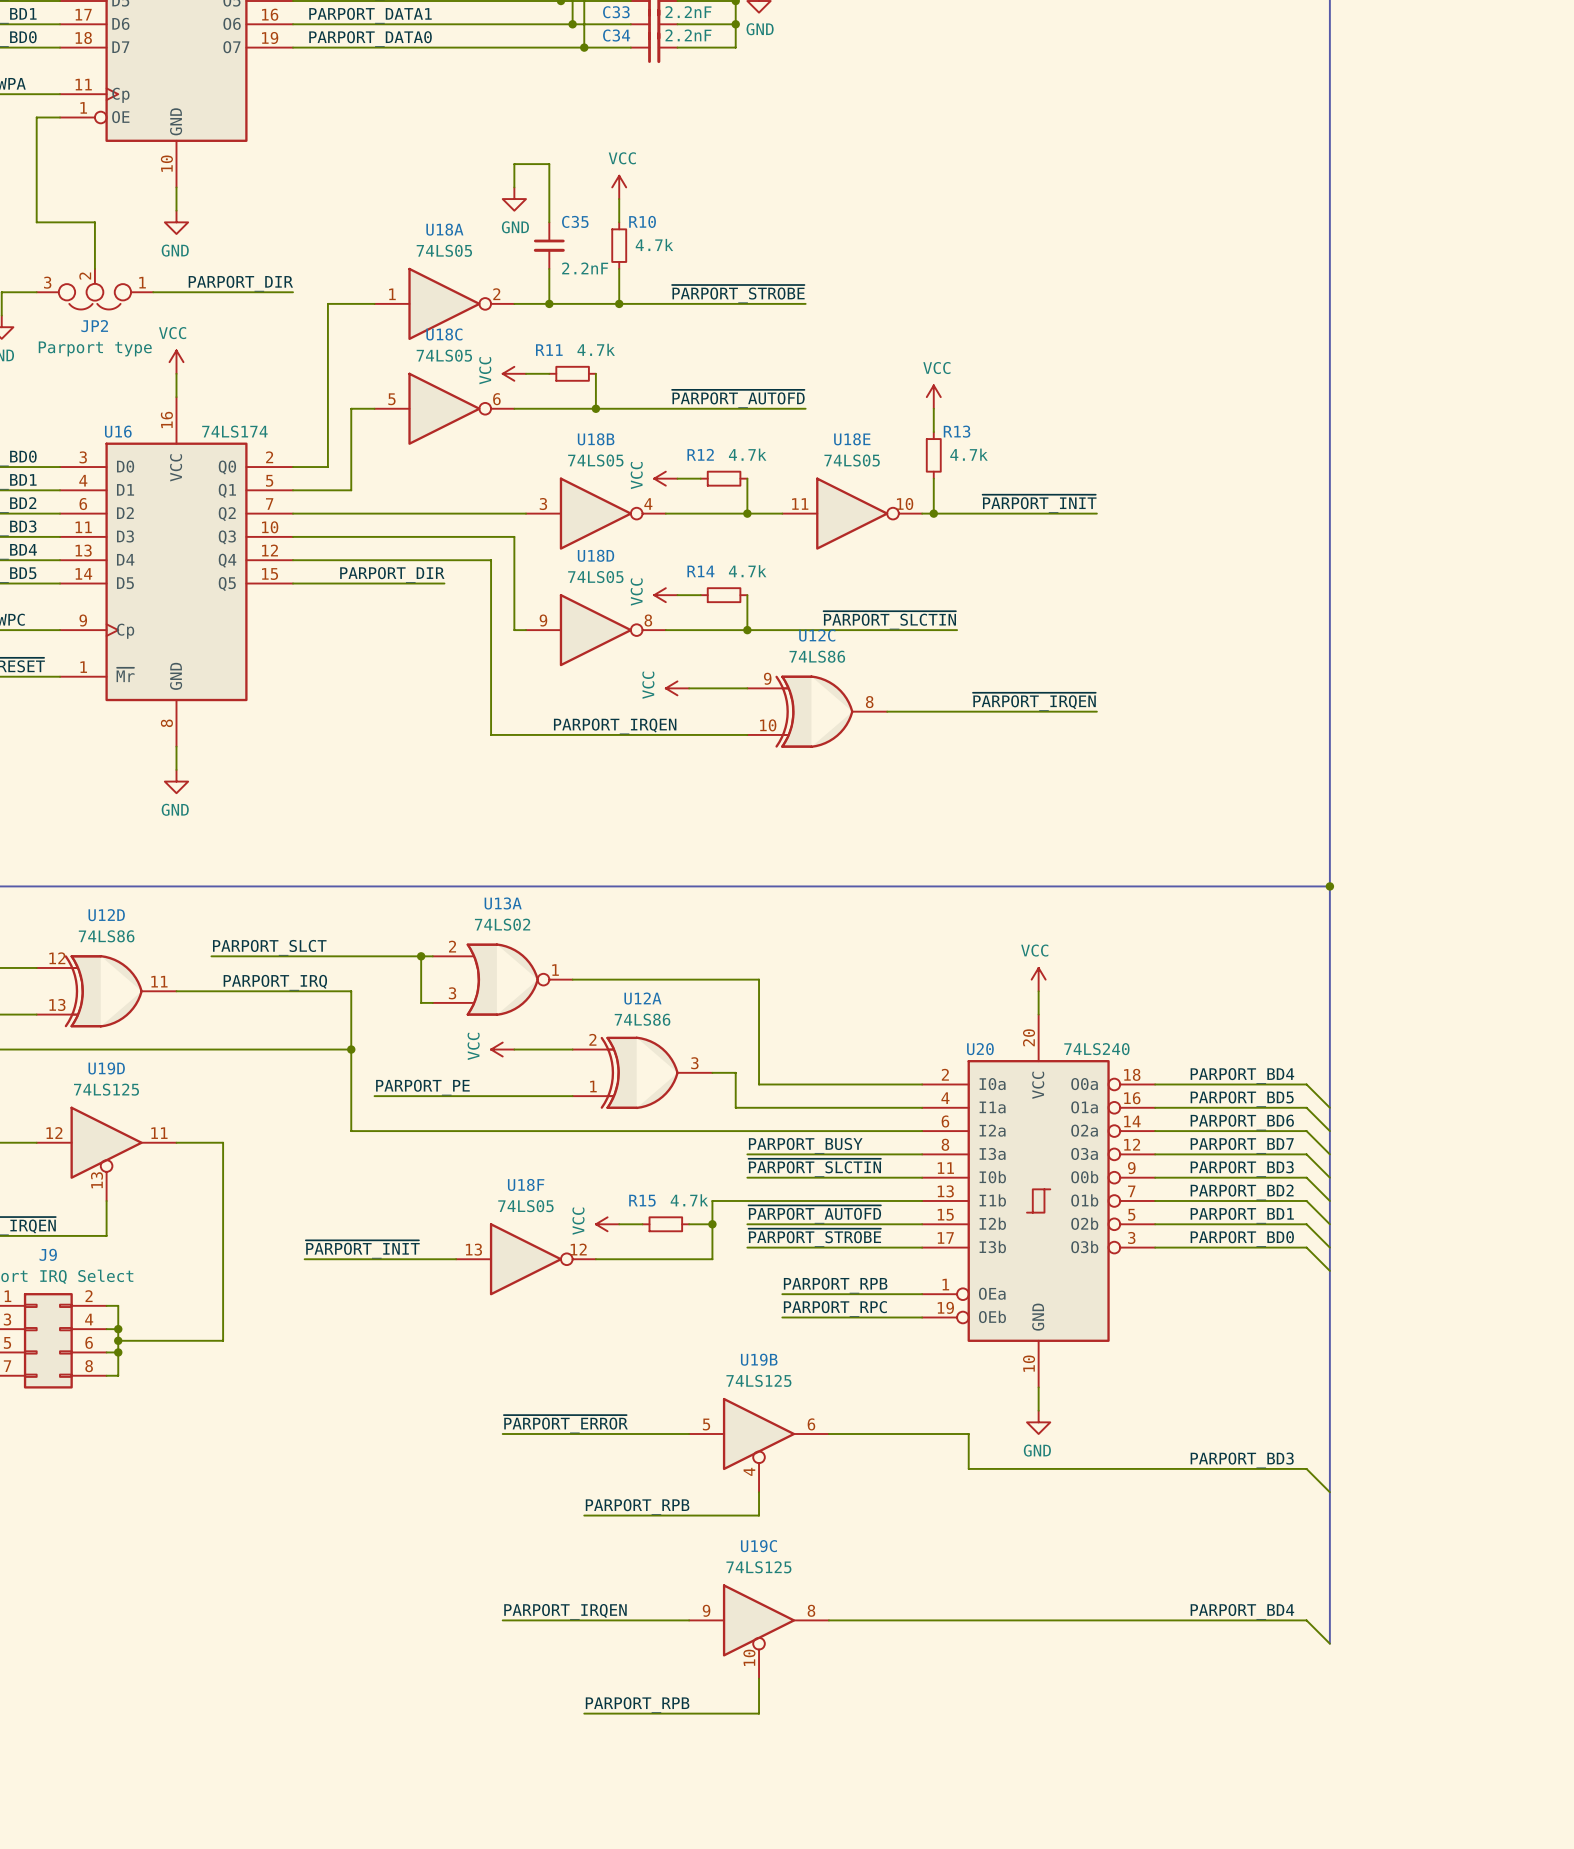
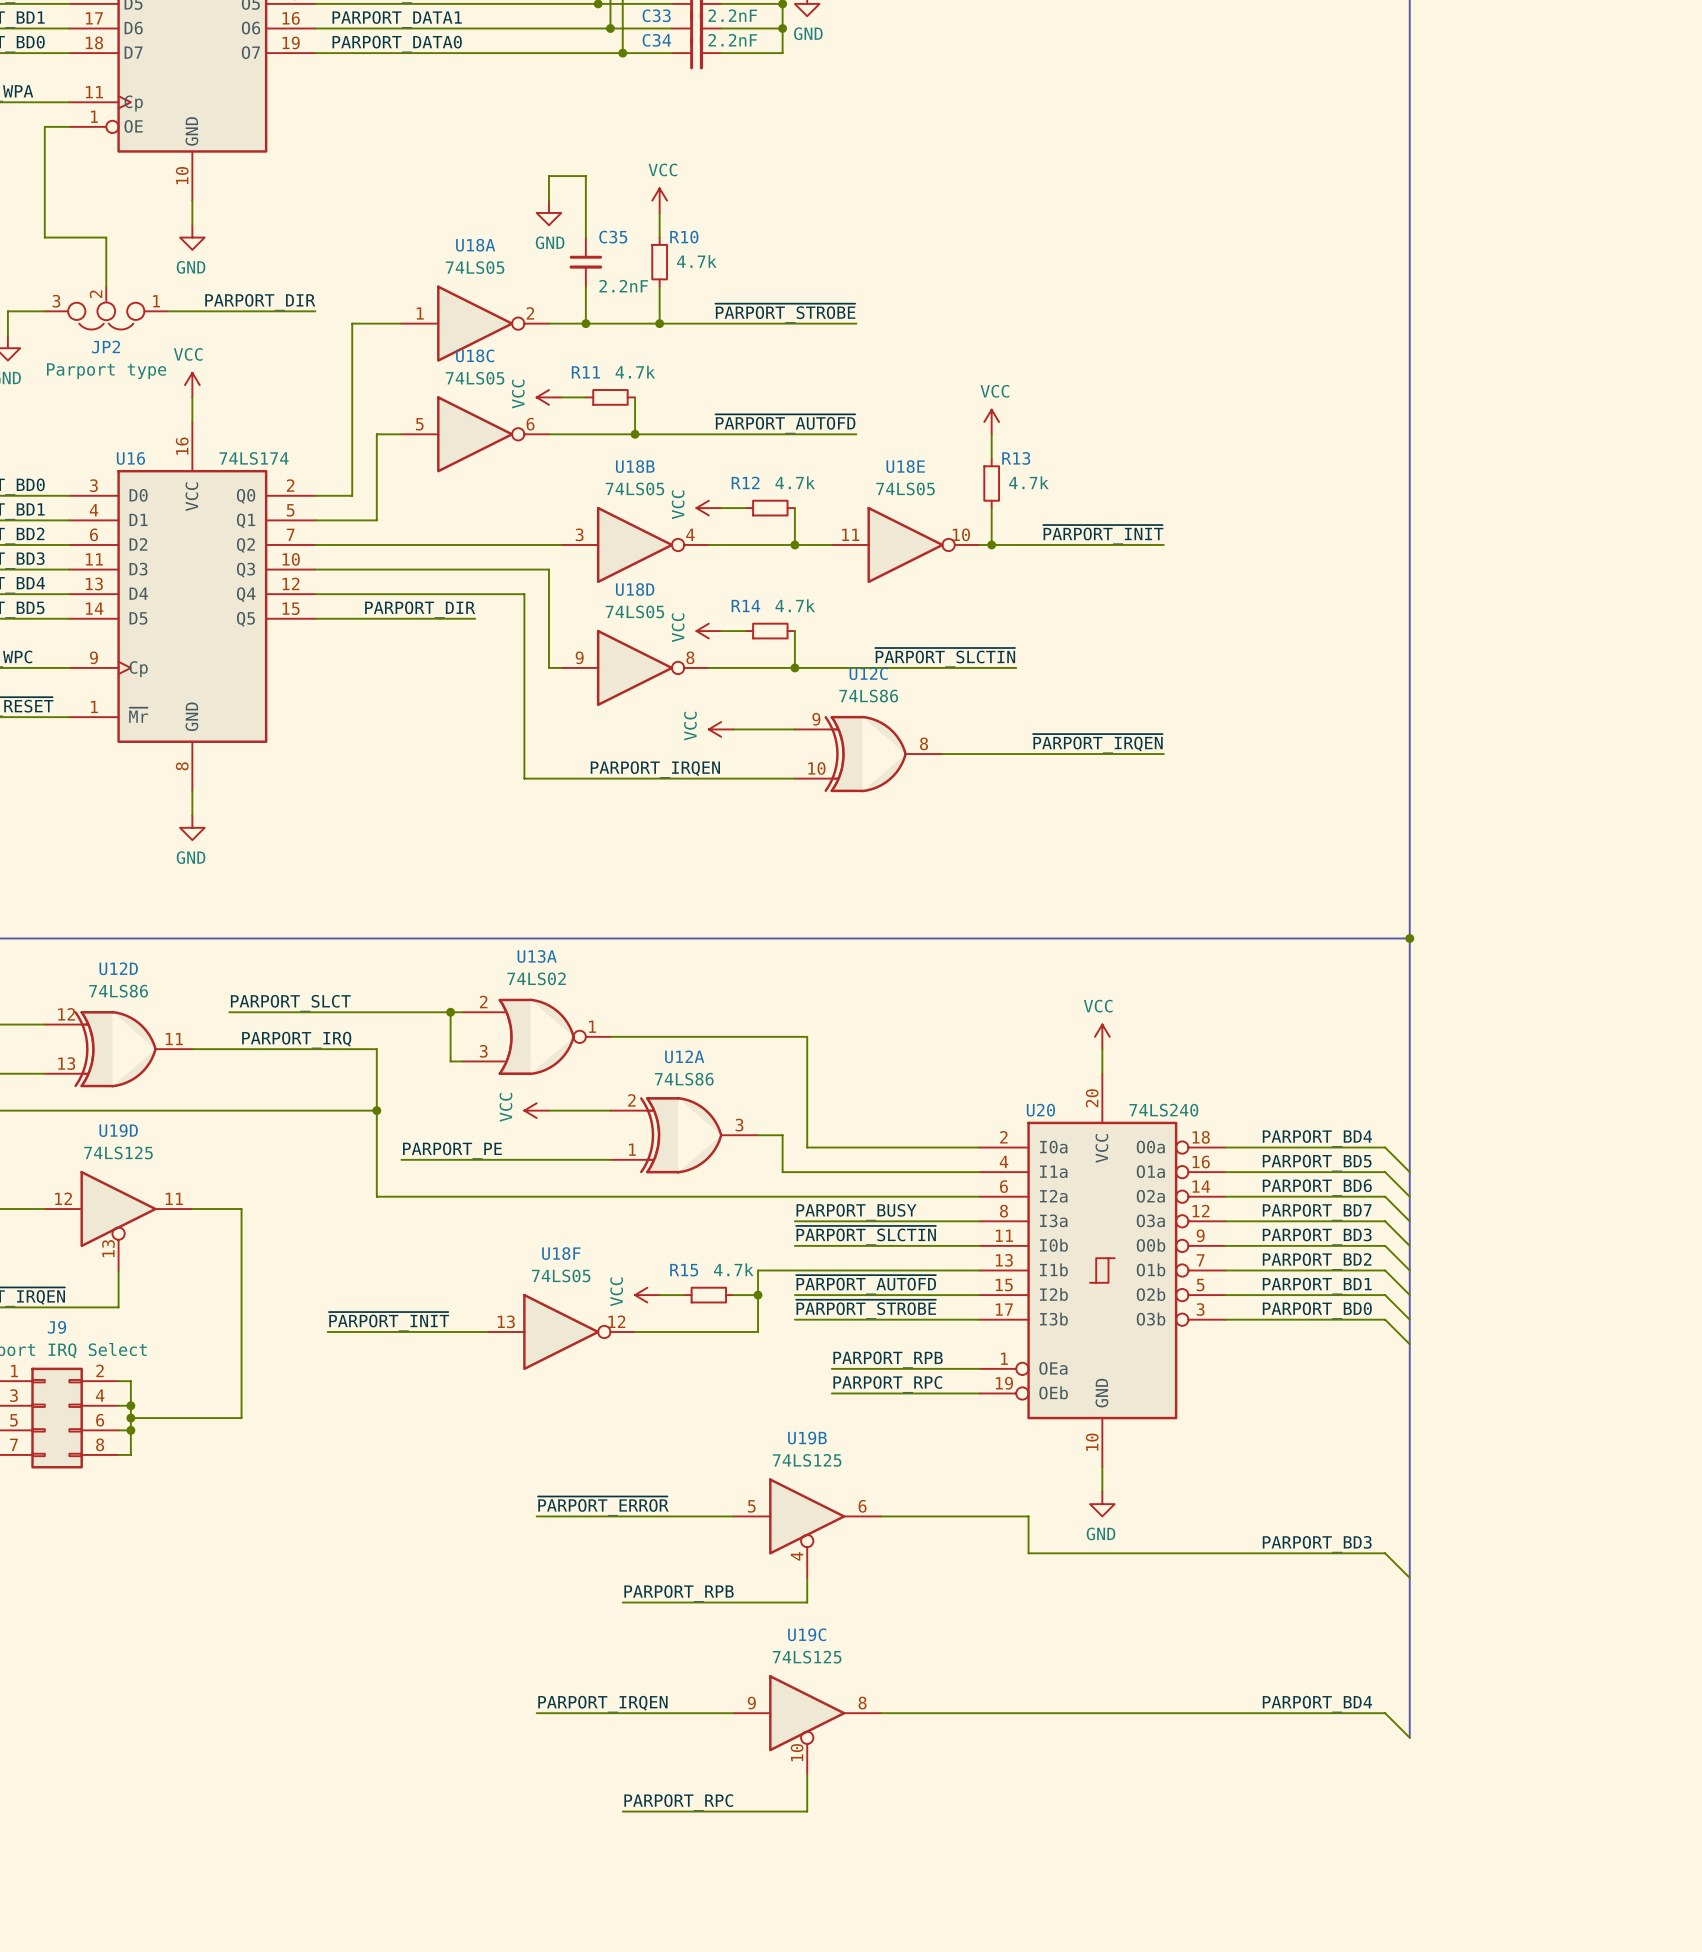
label: PARPORT_RPB (637, 1704) -> PARPORT_RPC (678, 1802)

